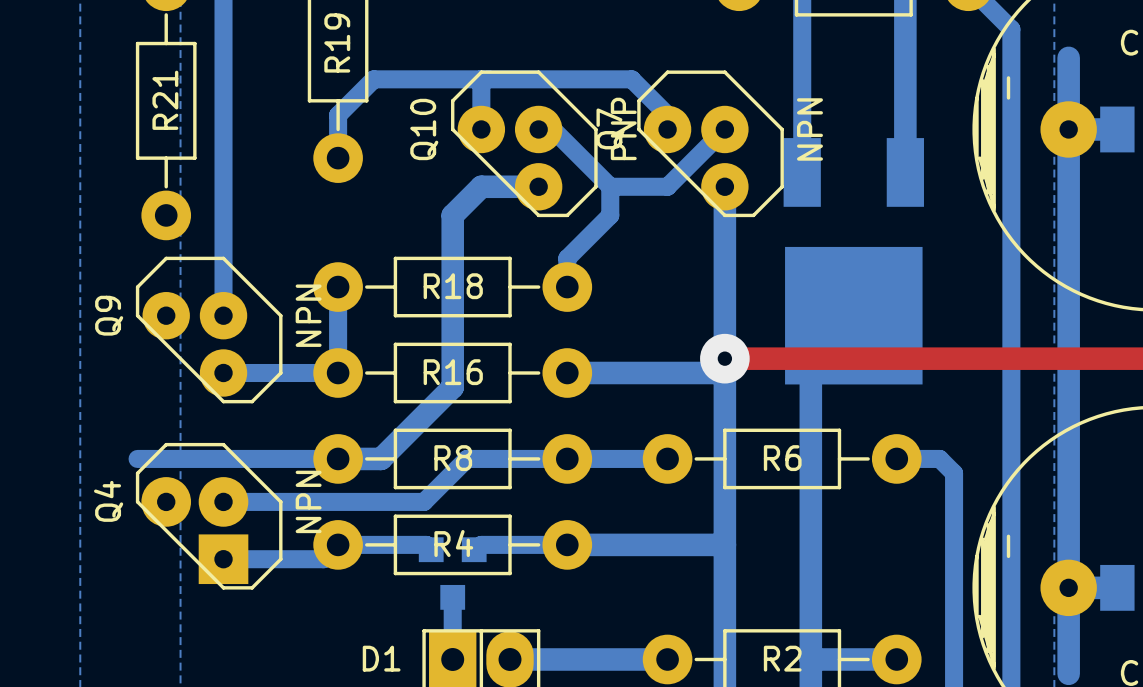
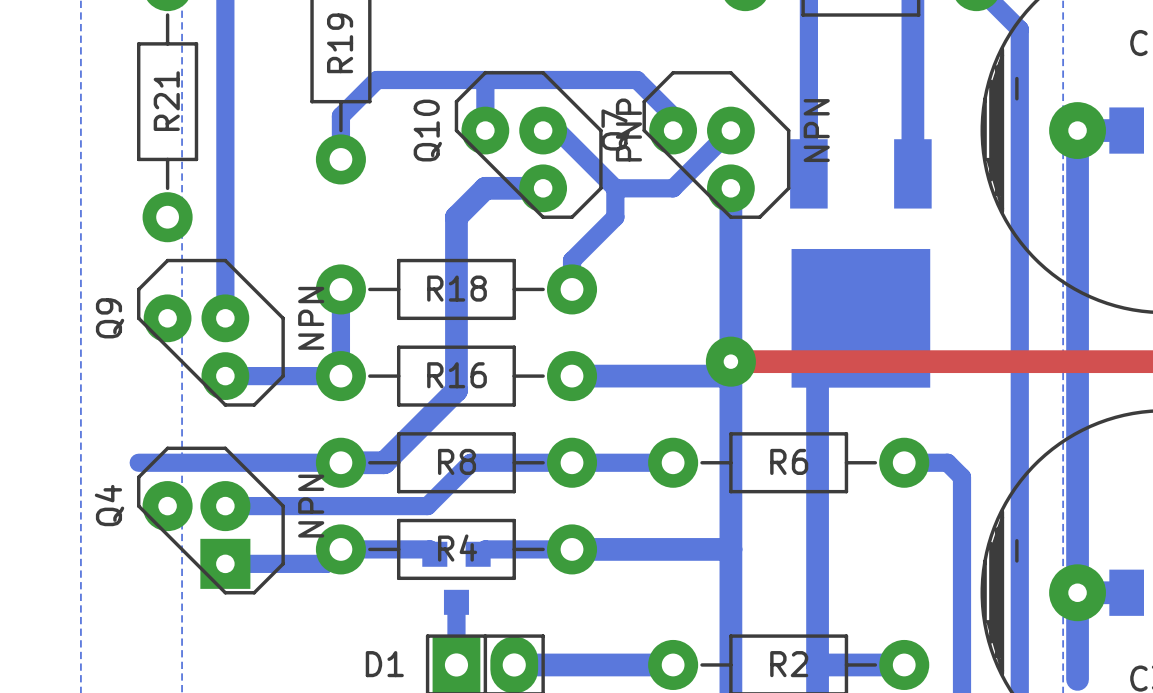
bottom track: (1068, 57) (1068, 129) -> none

